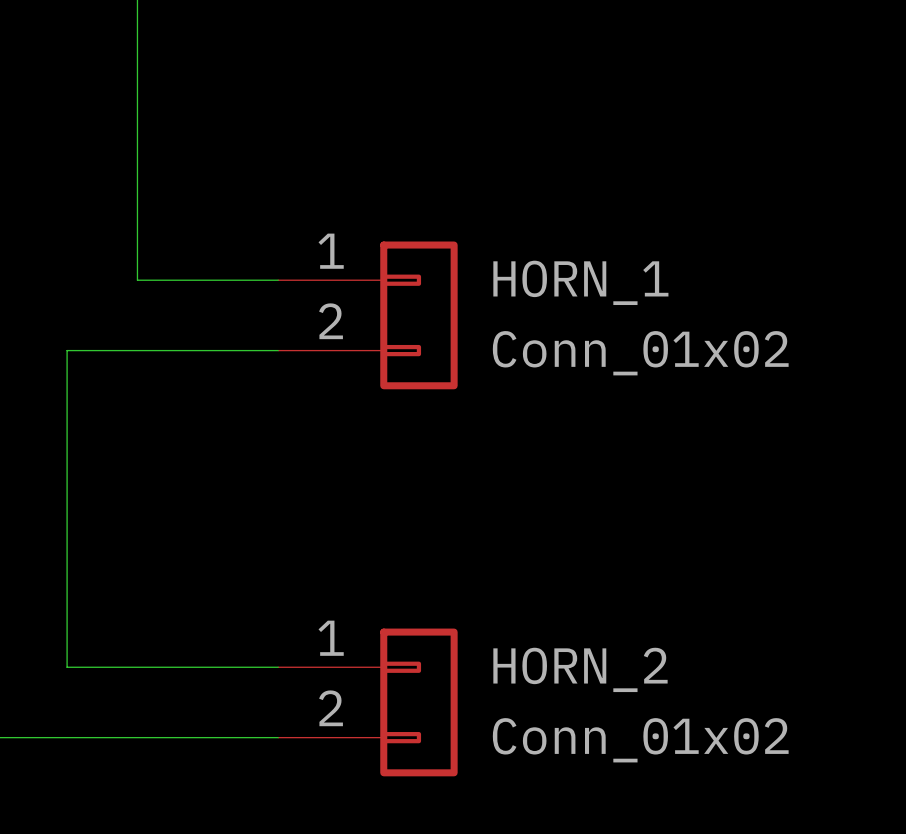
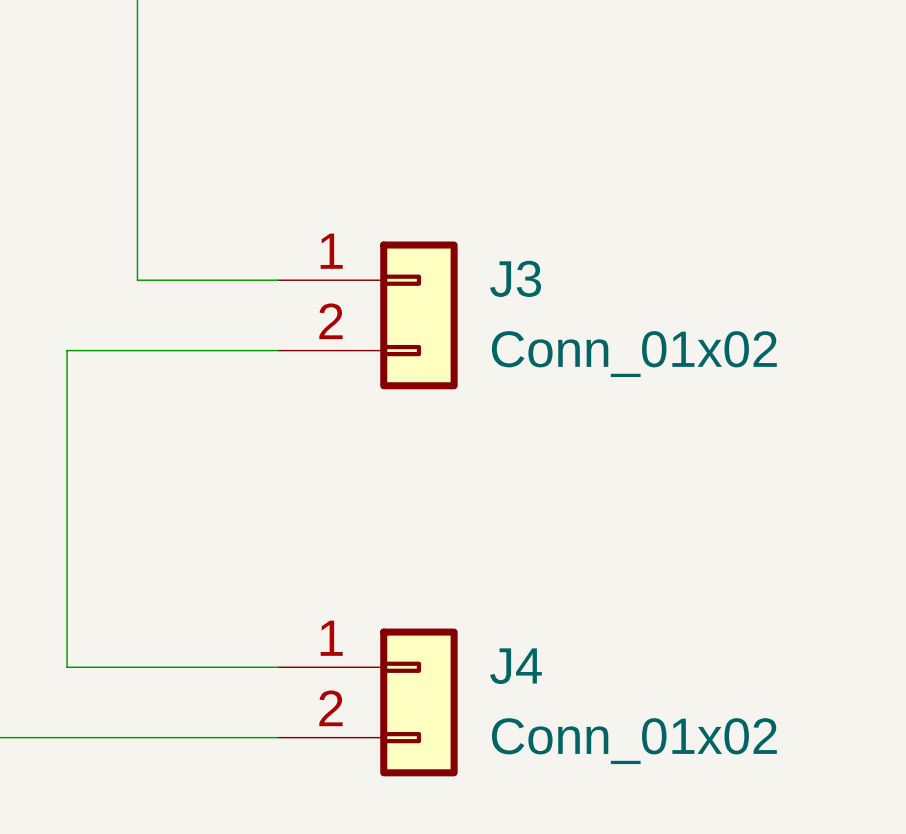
HORN_1 name: HORN_1 (580, 282) -> J3 (515, 278)
HORN_2 name: HORN_2 (580, 669) -> J4 (515, 666)

